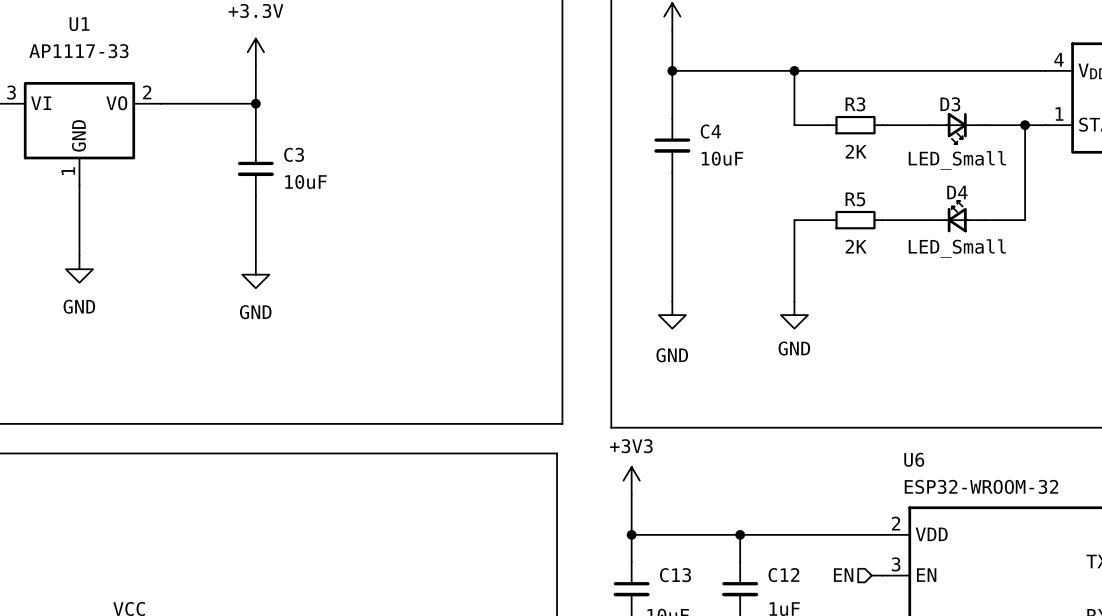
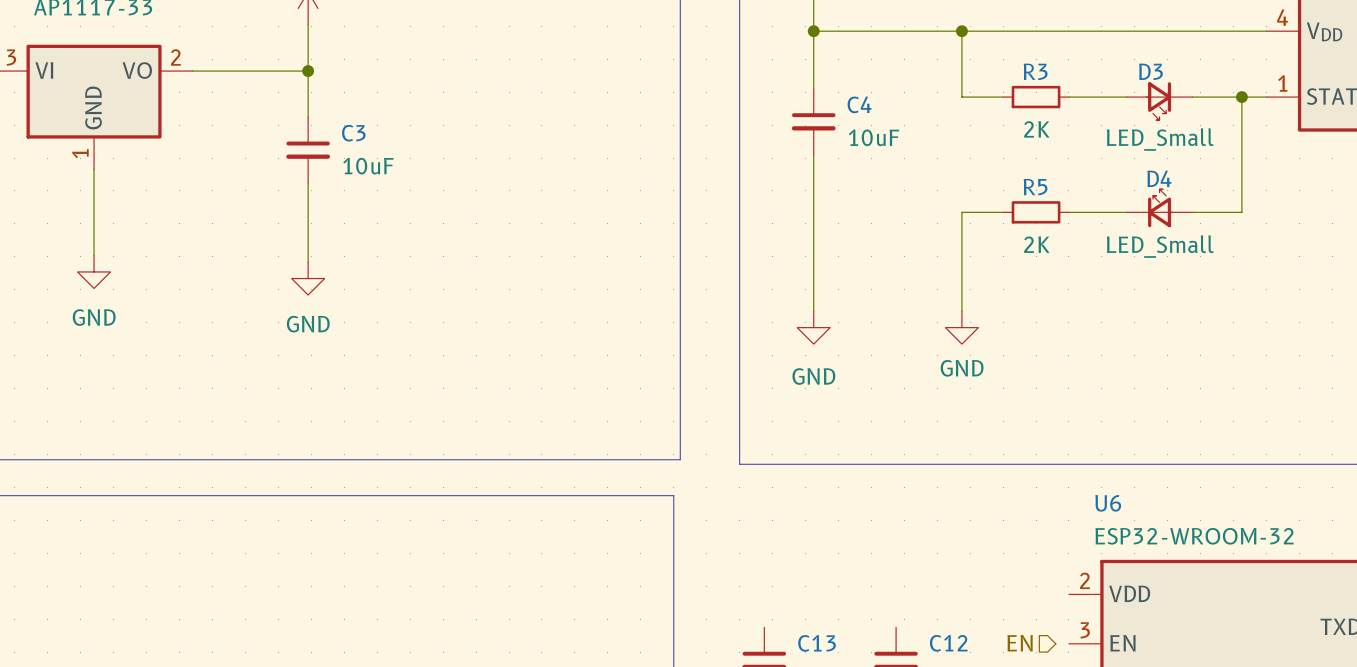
power symbol: +3V3 (631, 480) -> none
wire: (631, 494) (631, 562) -> none
wire: (631, 534) (882, 534) -> none
junction: (631, 534) -> none
wire: (740, 534) (740, 562) -> none
junction: (740, 534) -> none
wire: (871, 575) (882, 575) -> none

